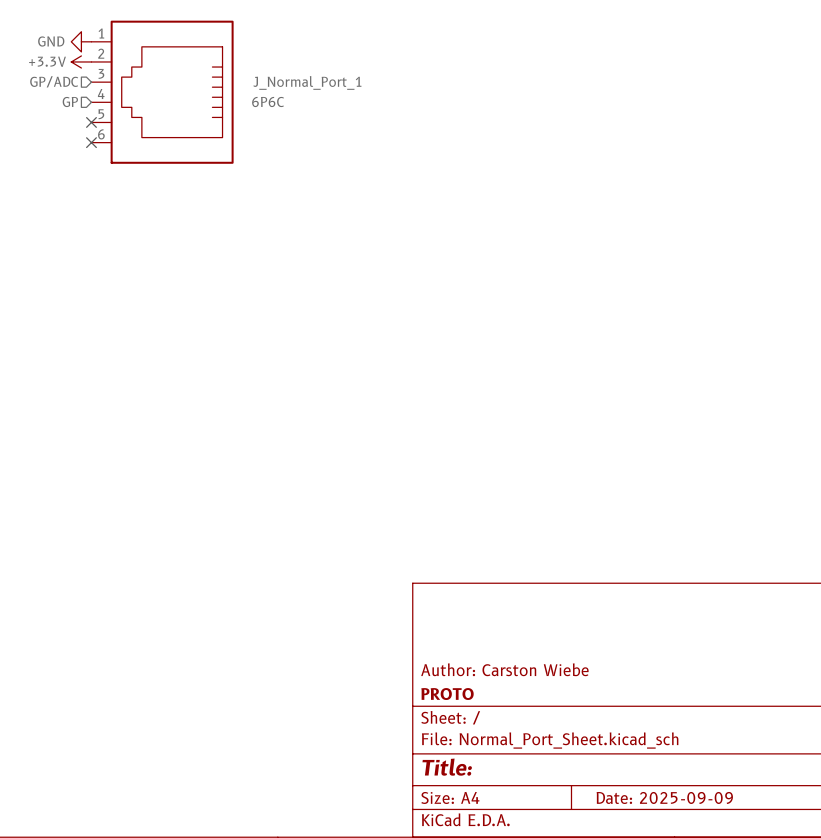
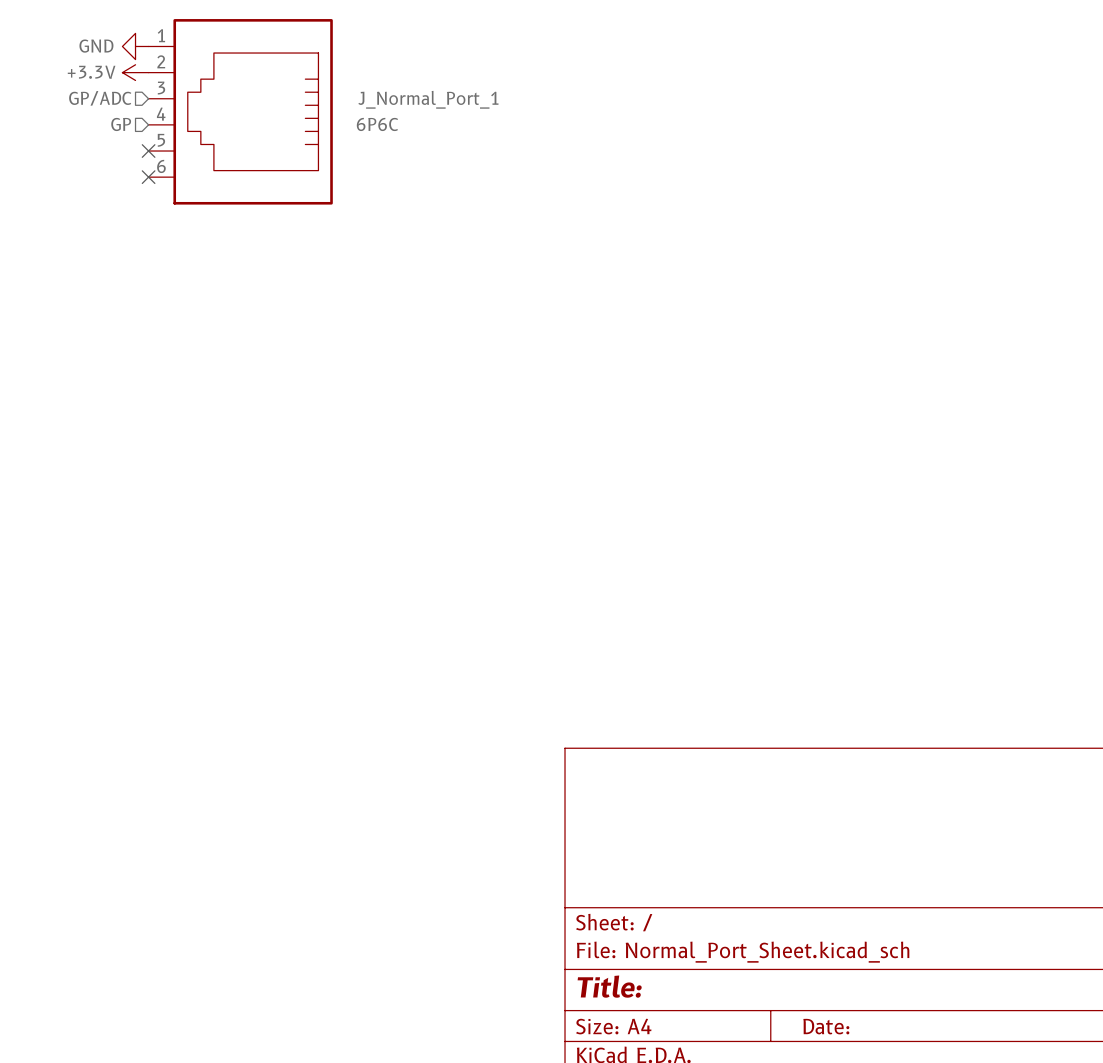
title block: Author: Carston Wiebe (504, 669) -> none
title block: PROTO (447, 694) -> none
title block: Date: 2025-09-09 (664, 797) -> Date: (826, 1026)

